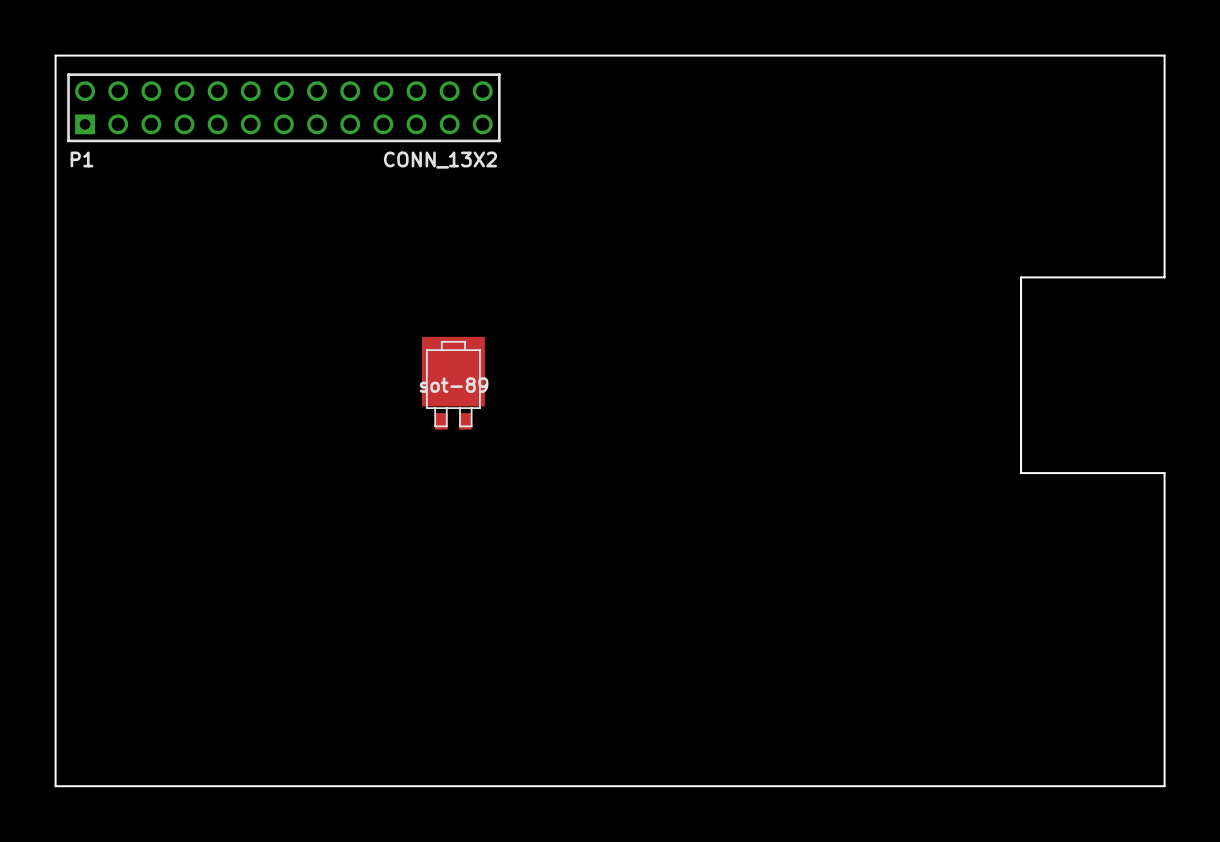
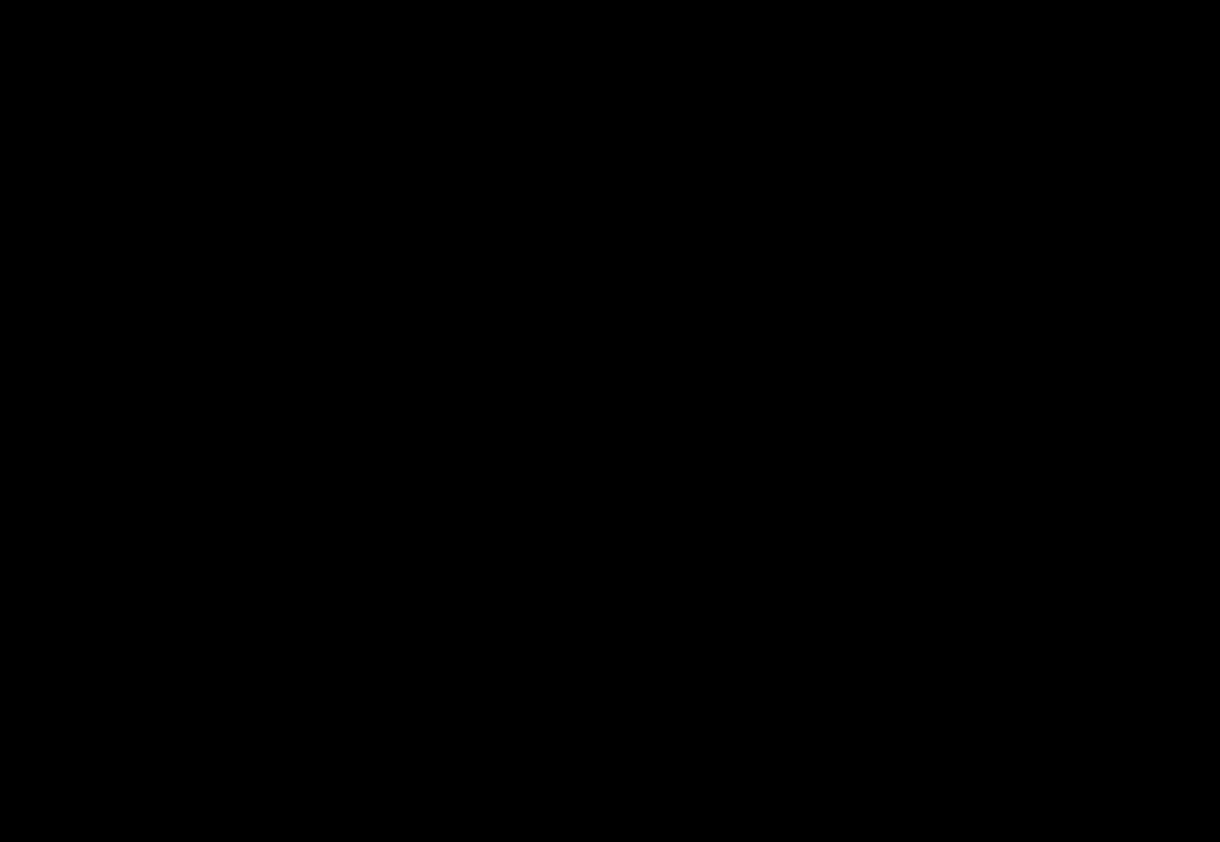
board edge: (55, 55) (1164, 55) (1164, 277) (1021, 277) (1021, 473) (1164, 473) (1164, 786) (55, 786) (55, 55) -> none
P1: CONN_13X2 (283, 107) -> none
sot-89: (453, 383) -> none

